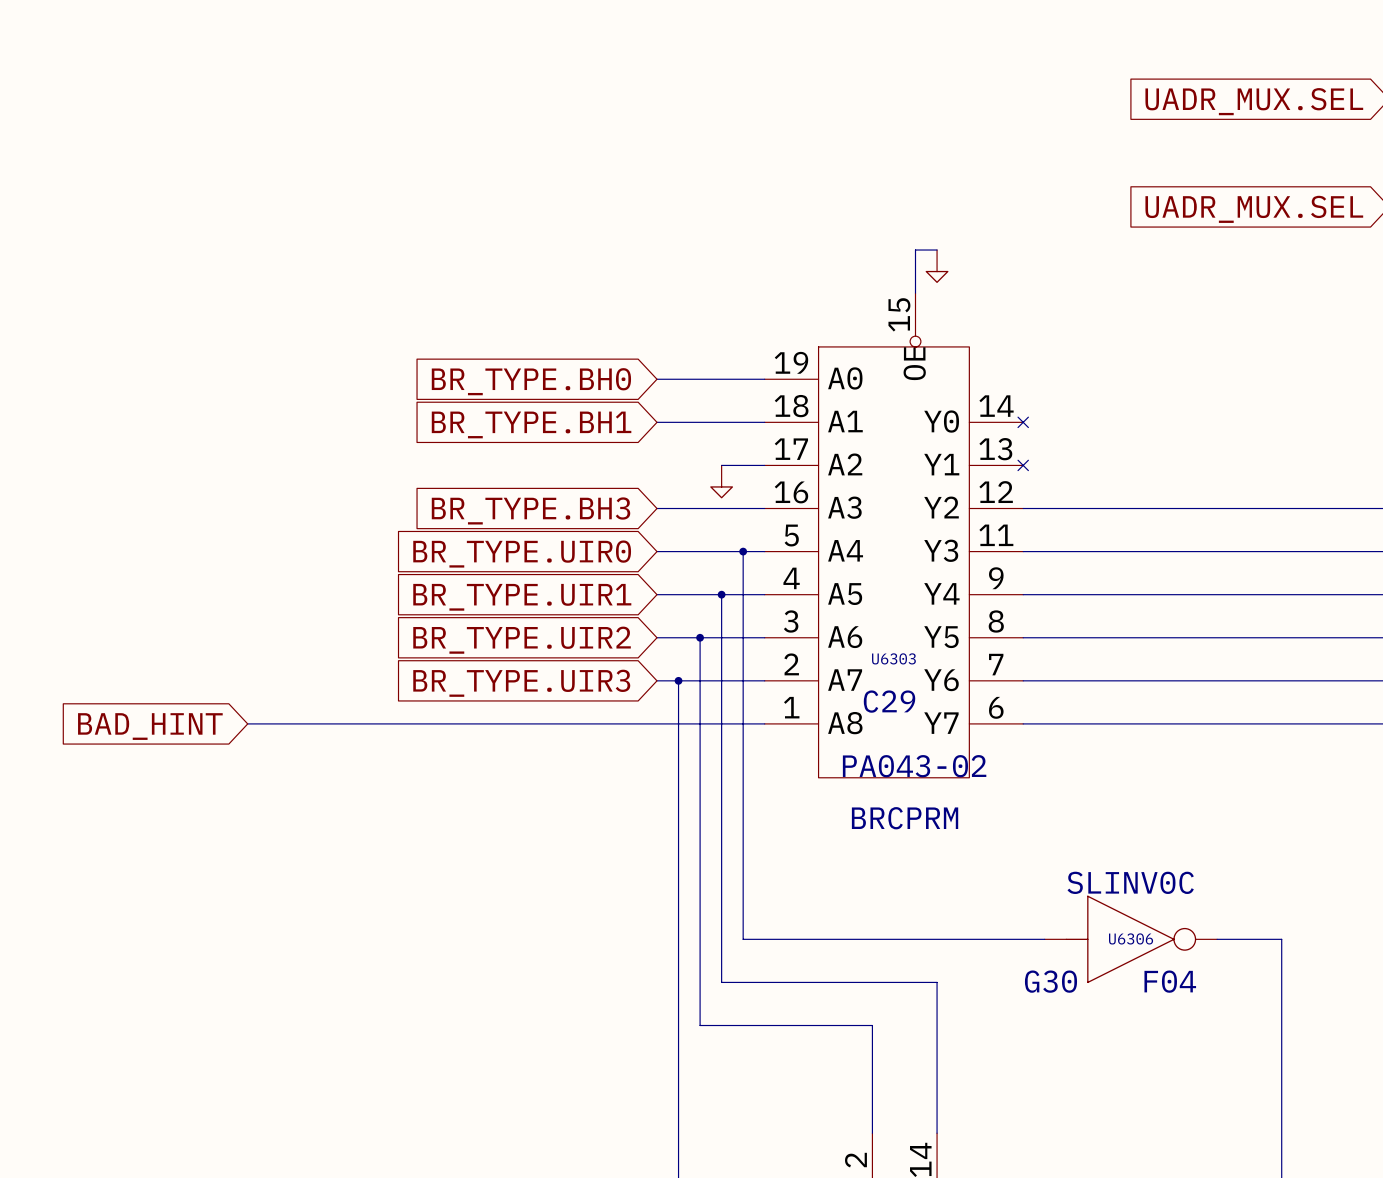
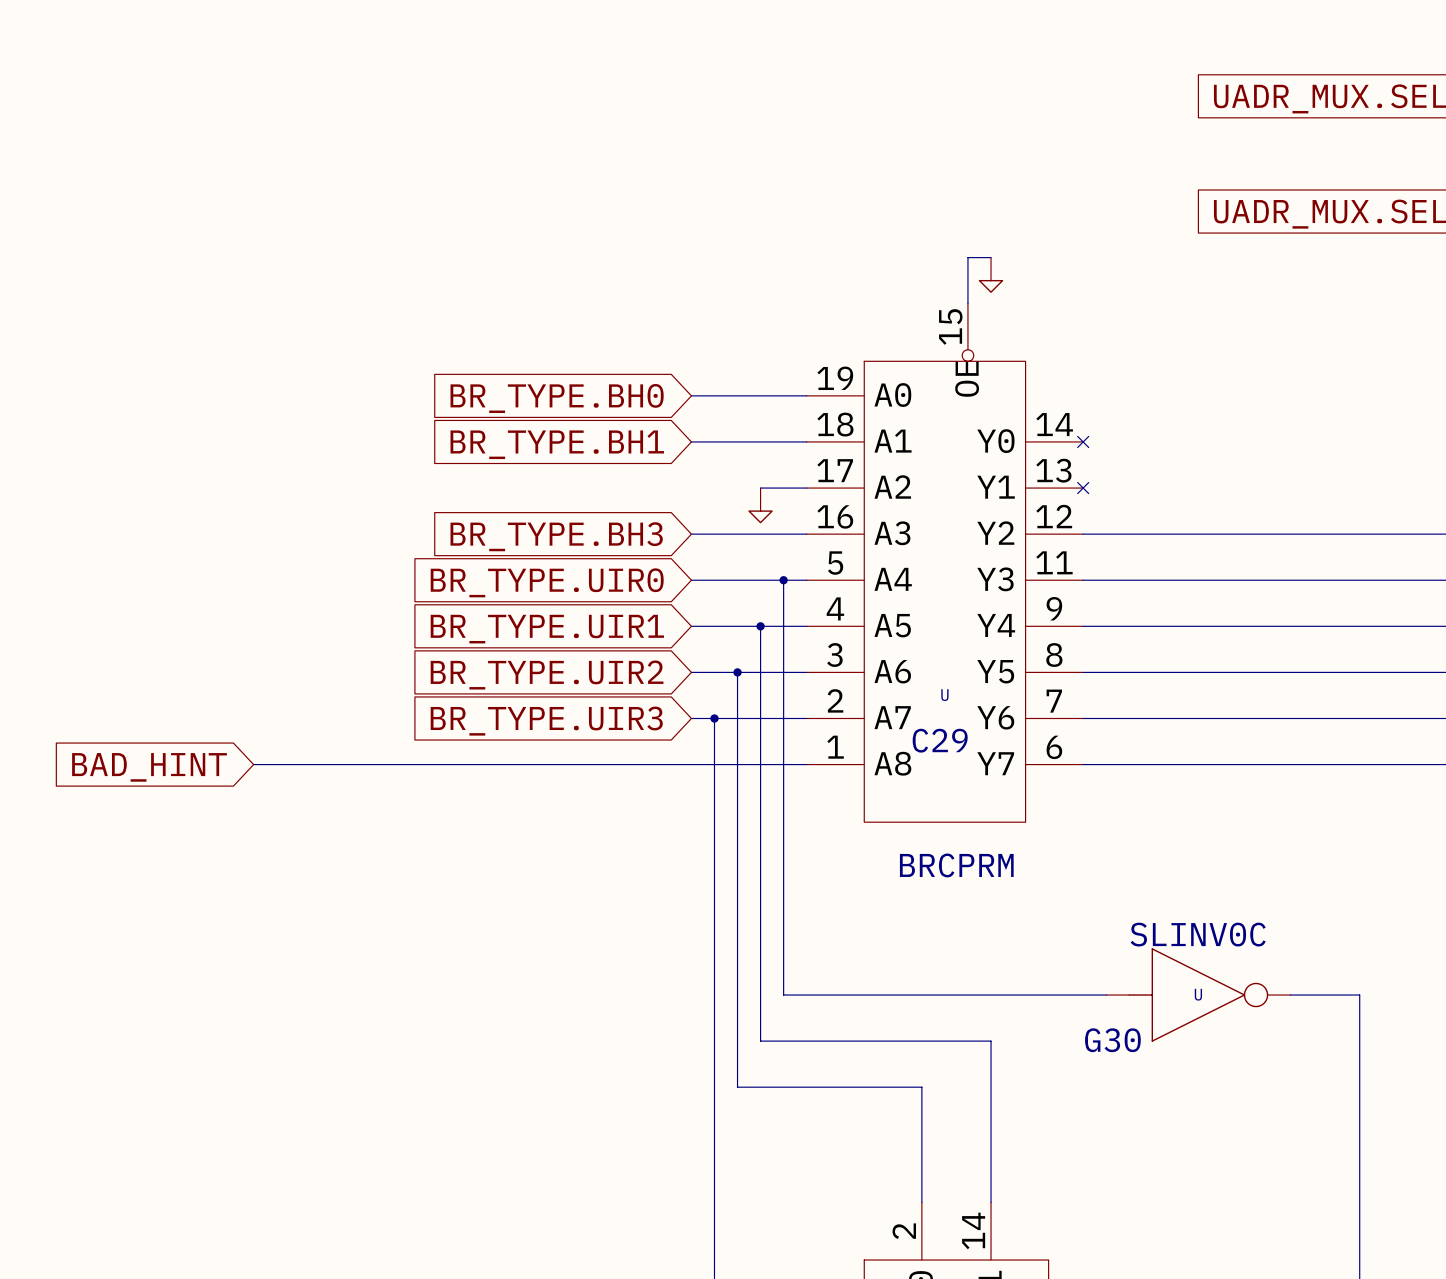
U6303 name: U6303 (893, 658) -> U (944, 695)
U6303 value: PA043-02 (914, 766) -> none
U6306 name: U6306 (1131, 938) -> U (1198, 994)
U6306 value: F04 (1170, 981) -> none

